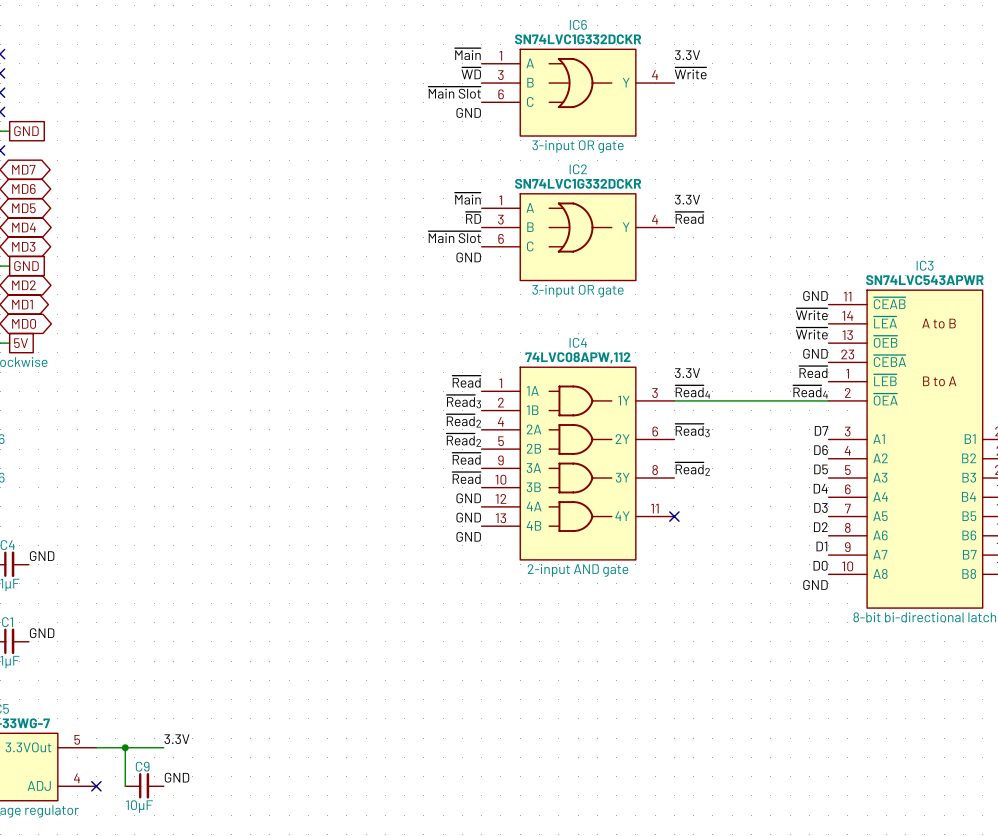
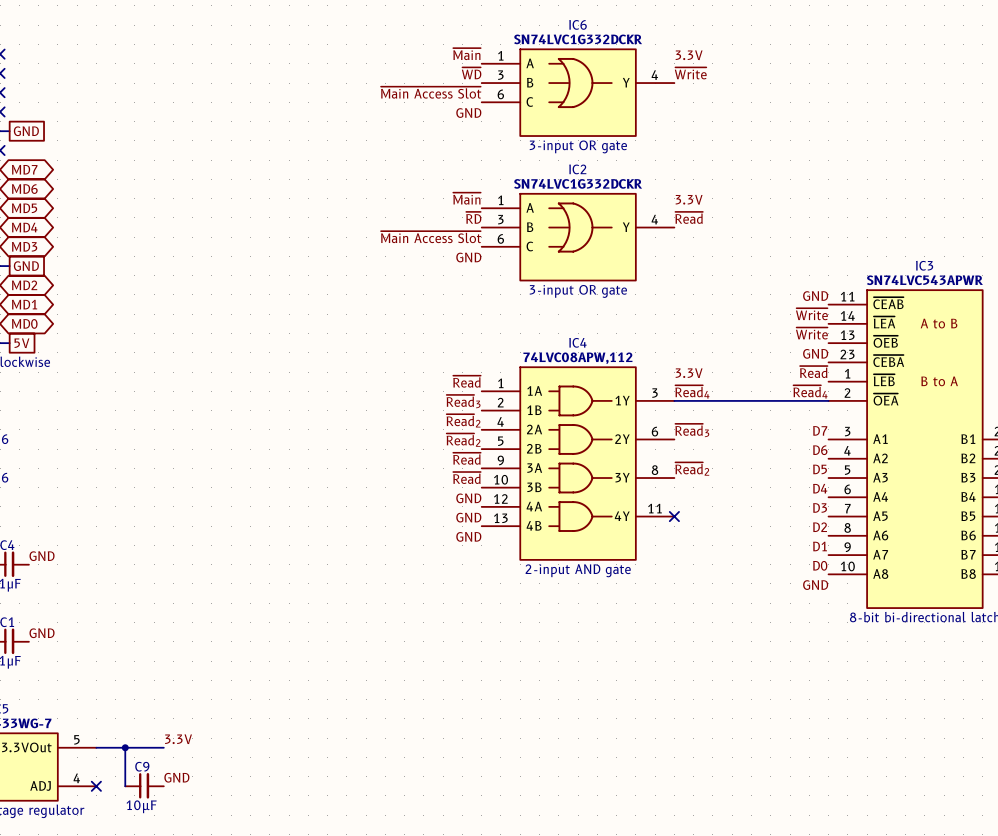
label: ~{Main Slot} (454, 92) -> ~{Main Access Slot} (431, 92)
label: ~{Main Slot} (454, 237) -> ~{Main Access Slot} (431, 237)

